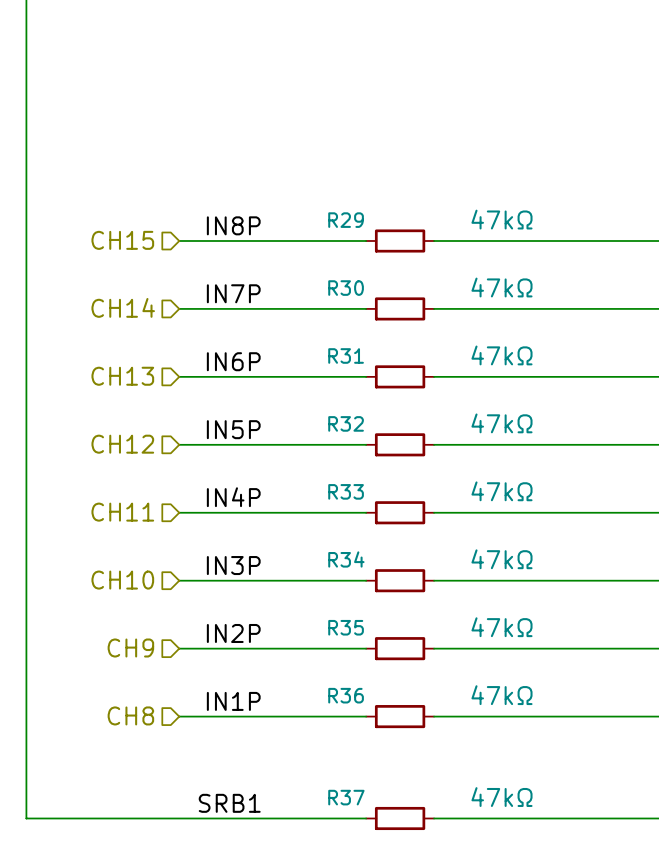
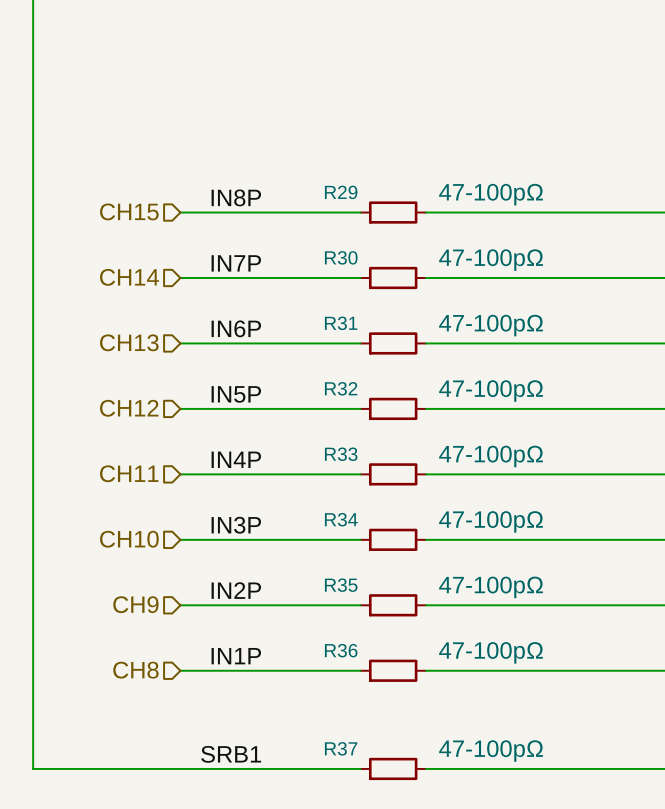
R29 value: 47kΩ (501, 219) -> 47-100pΩ (491, 194)
R30 value: 47kΩ (501, 287) -> 47-100pΩ (491, 260)
R31 value: 47kΩ (501, 355) -> 47-100pΩ (491, 325)
R32 value: 47kΩ (501, 423) -> 47-100pΩ (491, 391)
R33 value: 47kΩ (501, 491) -> 47-100pΩ (491, 456)
R34 value: 47kΩ (501, 559) -> 47-100pΩ (491, 521)
R35 value: 47kΩ (501, 627) -> 47-100pΩ (491, 587)
R36 value: 47kΩ (501, 695) -> 47-100pΩ (491, 652)
R37 value: 47kΩ (501, 797) -> 47-100pΩ (491, 751)

